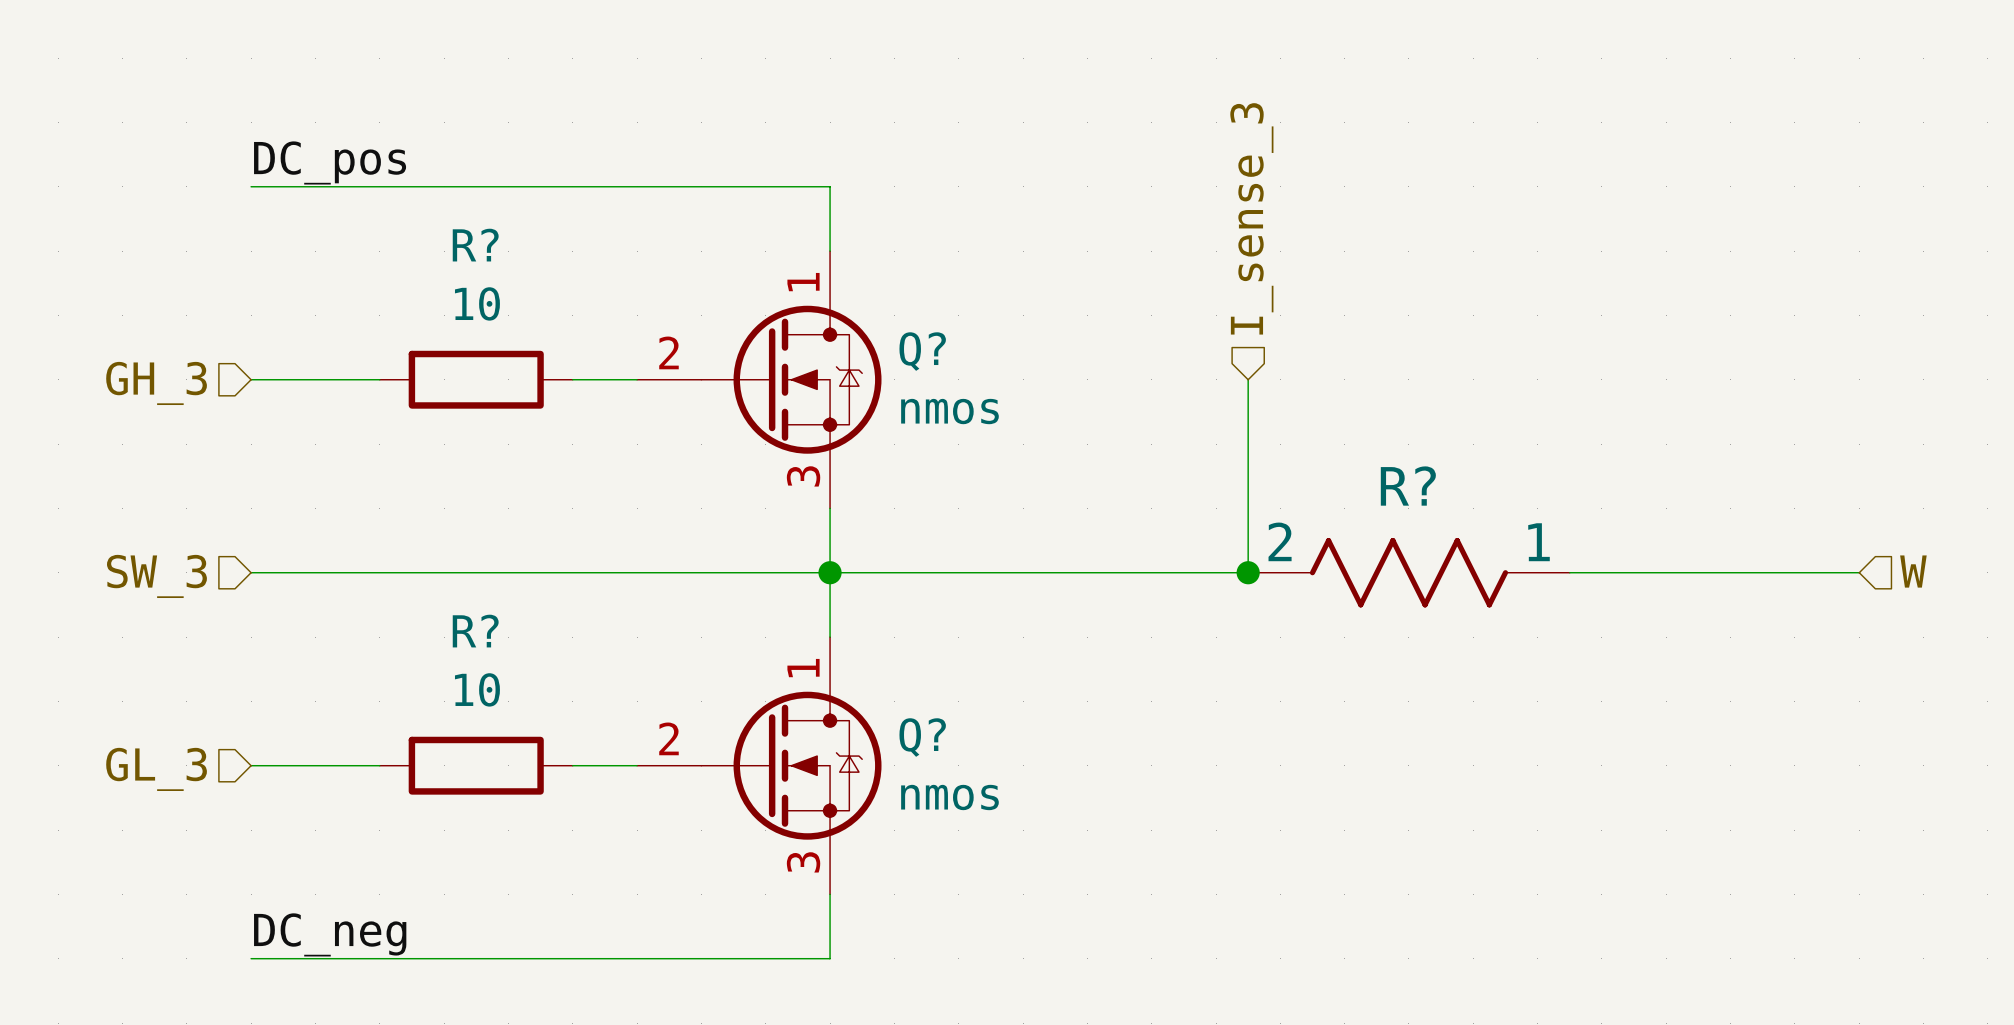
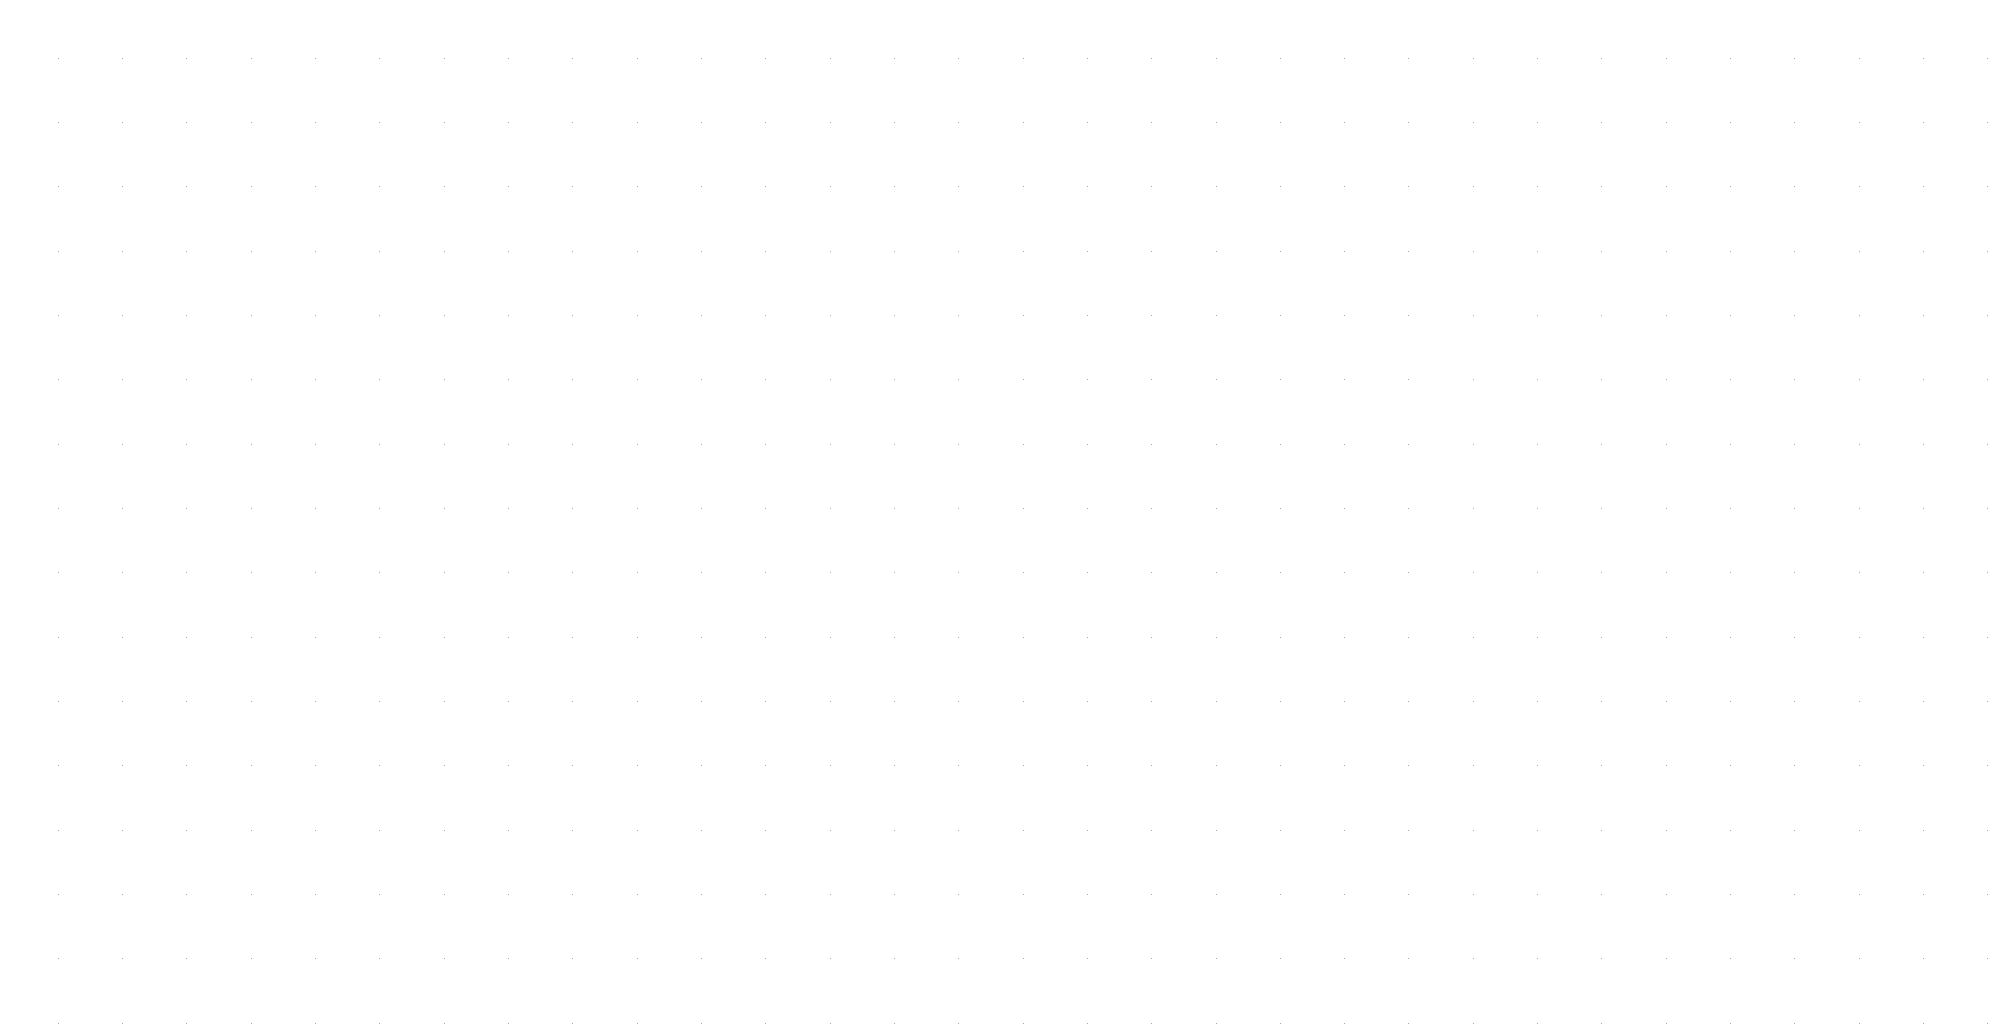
label: DC_pos (330, 162) -> none
wire: (251, 186) (830, 186) (830, 251) -> none
hierarchical label: I_sense_3 (1251, 218) -> none
wire: (251, 379) (379, 379) -> none
R?: 10 (476, 379) -> none
wire: (572, 379) (637, 379) -> none
Q?: nmos (759, 379) -> none
wire: (1248, 379) (1248, 572) (251, 572) -> none
hierarchical label: GH_3 (156, 383) -> none
wire: (830, 508) (830, 637) -> none
hierarchical label: W (1913, 571) -> none
junction: (830, 572) -> none
junction: (1248, 572) -> none
R?: (1408, 572) -> none
wire: (1569, 572) (1859, 572) -> none
hierarchical label: SW_3 (156, 576) -> none
wire: (251, 765) (379, 765) -> none
R?: 10 (476, 765) -> none
wire: (572, 765) (637, 765) -> none
Q?: nmos (759, 765) -> none
hierarchical label: GL_3 (156, 769) -> none
wire: (830, 894) (830, 958) (251, 958) -> none
label: DC_neg (330, 934) -> none

